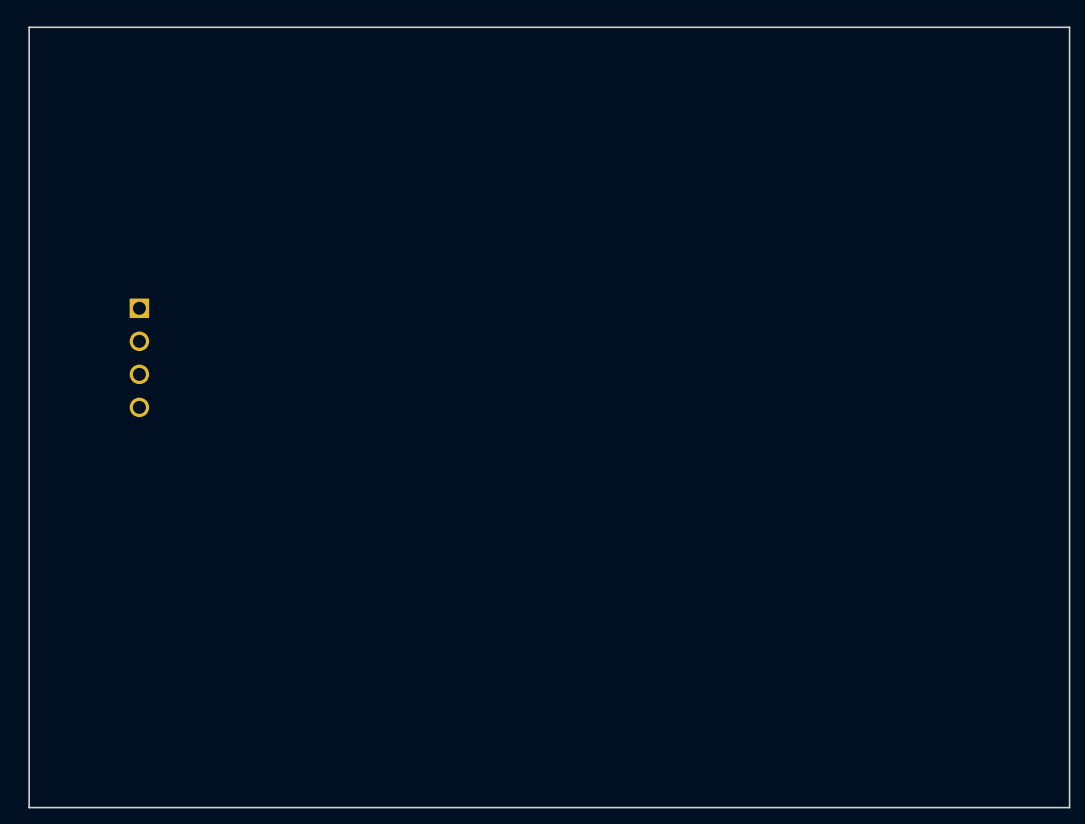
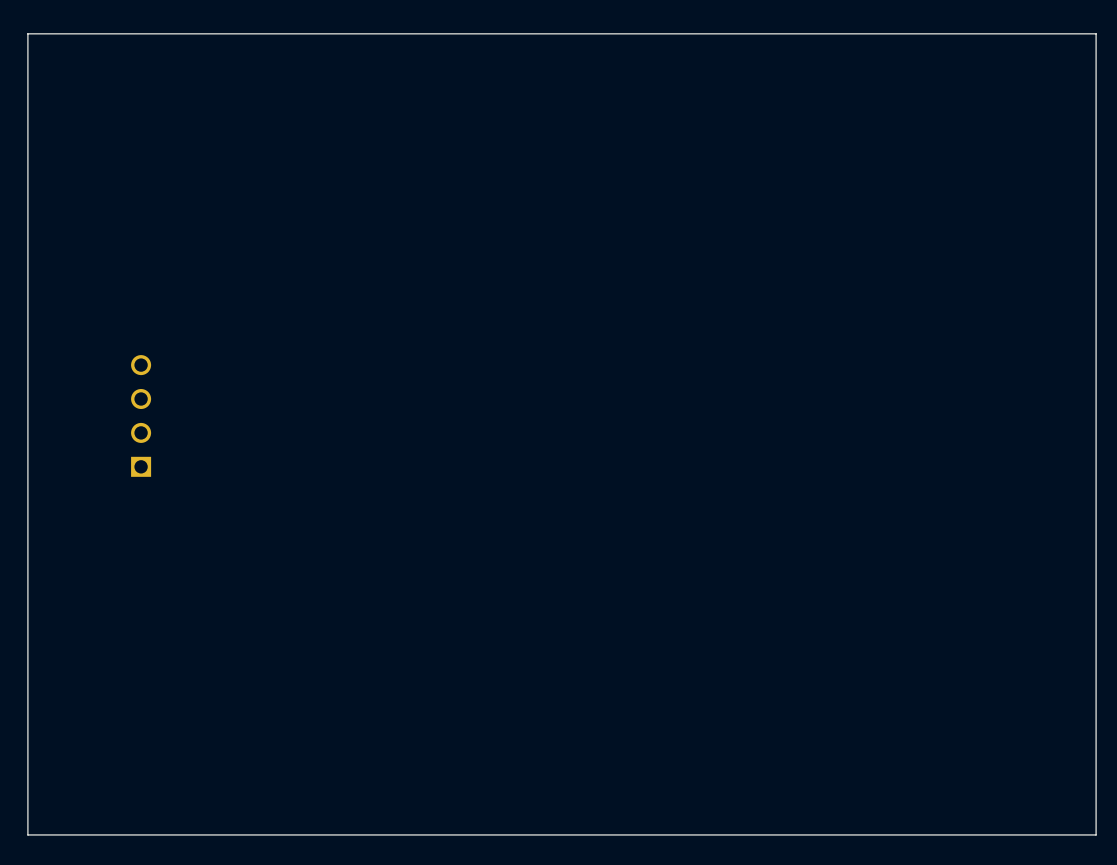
part rotation: 0° (139, 357) -> 180° (141, 415)

